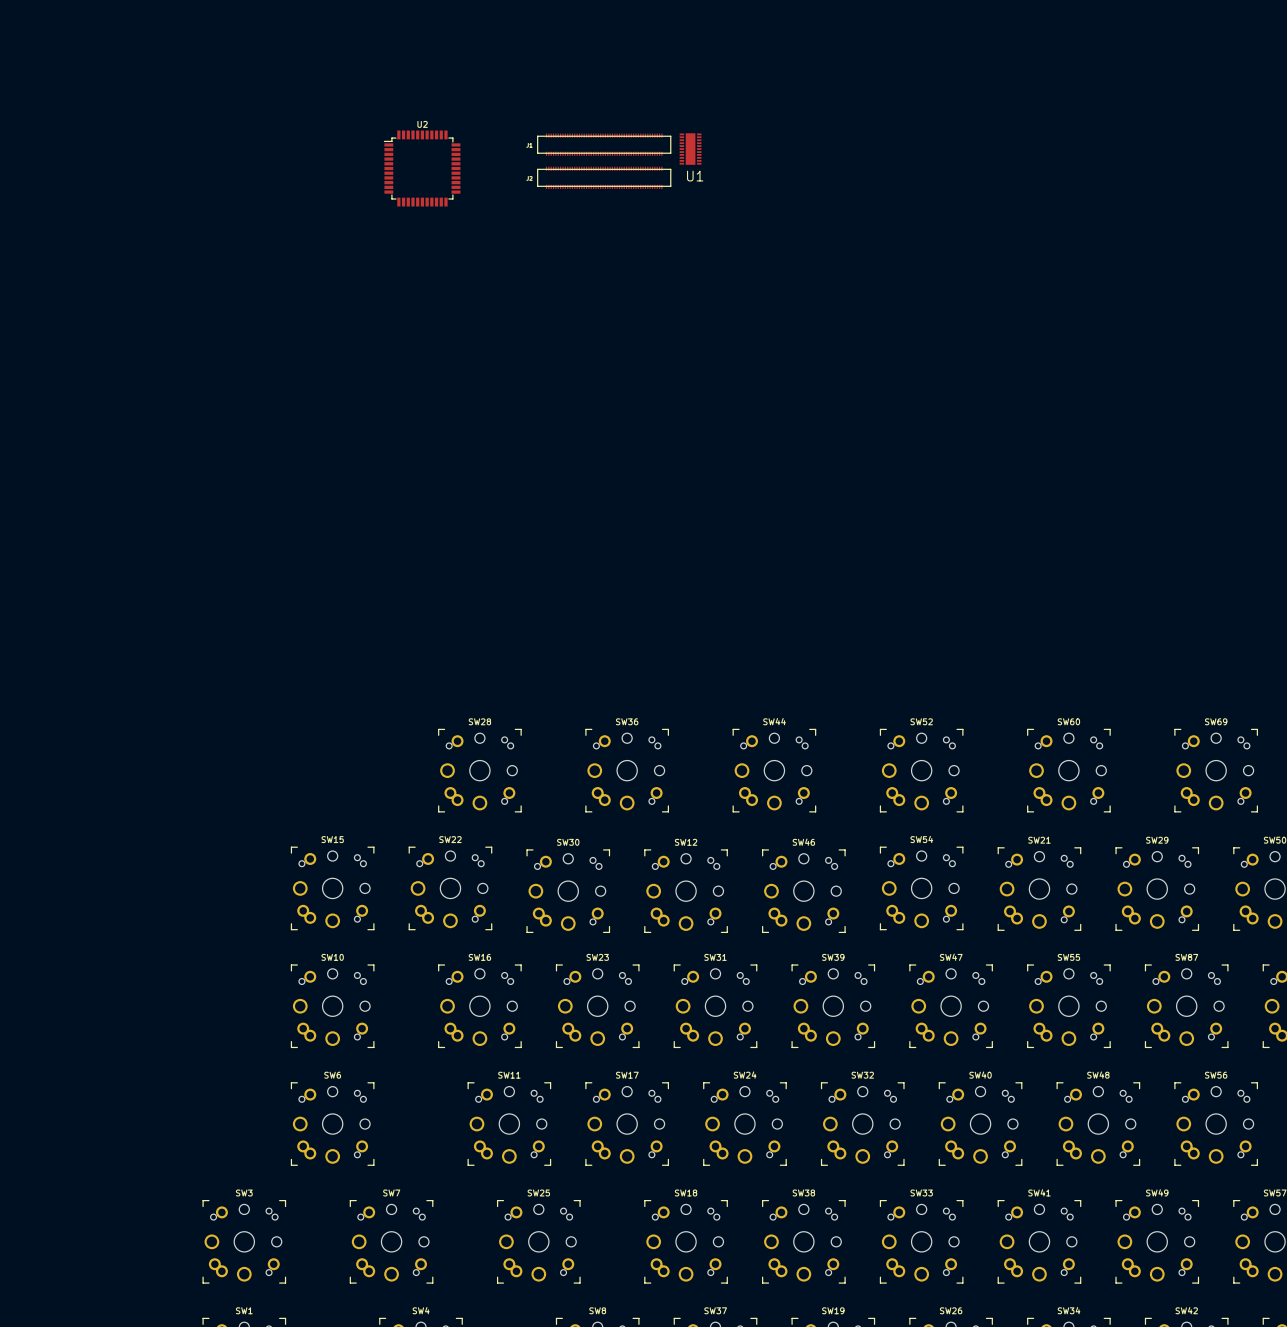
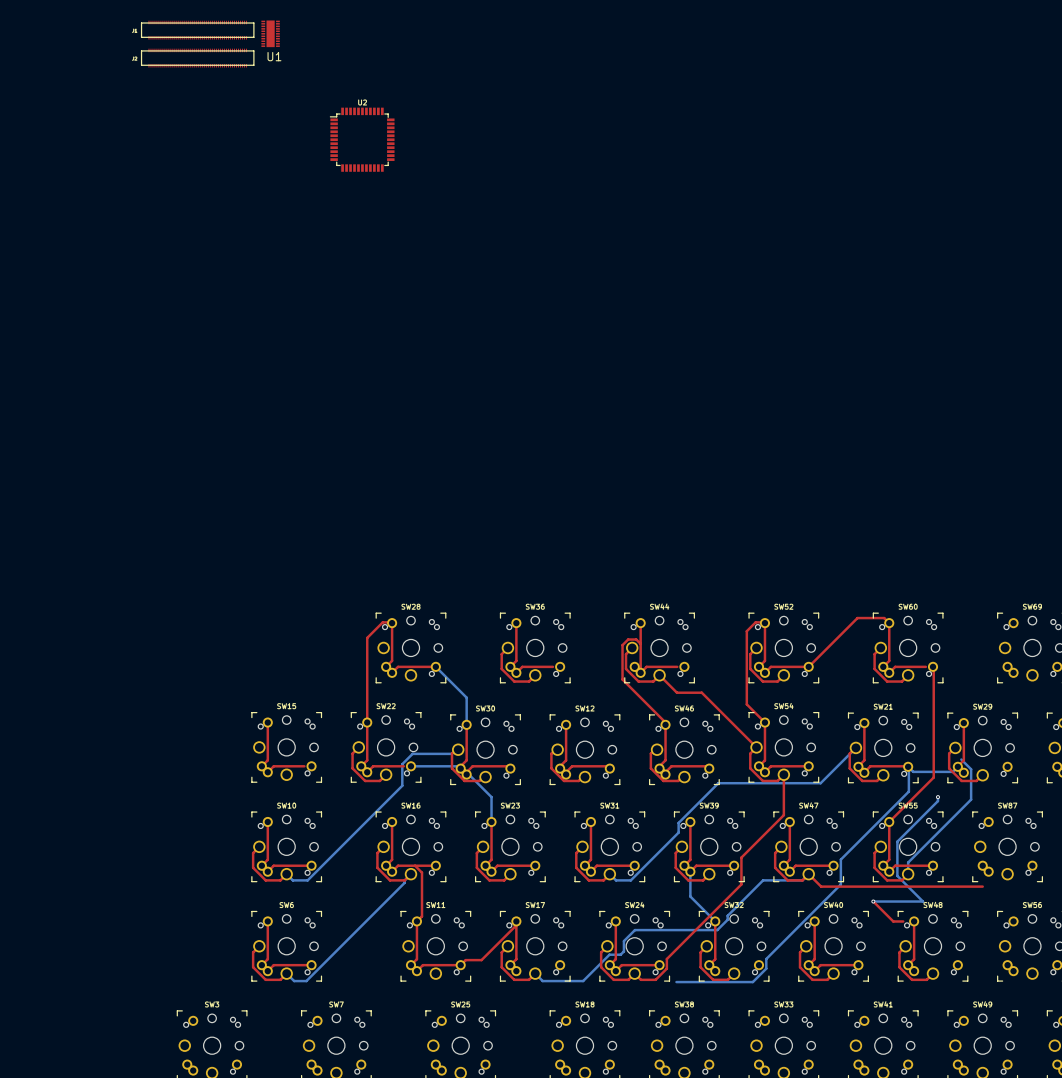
part position: (604, 144) -> (197, 30)
U1 position: (690, 149) -> (270, 33)
part position: (604, 177) -> (197, 58)
top track: none -> (516, 623) (516, 660) (510, 666) (516, 672) (522, 666) (552, 666)
top track: none -> (640, 623) (640, 672) (646, 666) (677, 666)
top track: none -> (640, 643) (636, 639) (628, 639) (622, 645) (622, 679) (665, 722) (665, 760) (659, 766)
top track: none -> (507, 647) (501, 654) (501, 668) (514, 681) (529, 681) (535, 675)
top track: none -> (632, 647) (626, 654) (626, 668) (638, 681) (653, 681) (659, 675) (676, 692) (701, 692) (756, 747) (750, 753) (750, 768) (762, 780) (777, 780) (783, 774) (783, 815) (741, 857) (741, 884) (666, 959) (666, 968) (655, 979) (640, 979) (634, 973) (628, 979) (613, 979) (601, 967) (601, 952) (607, 946)
top track: none -> (756, 647) (750, 654) (750, 668) (762, 681) (777, 681) (783, 675)
top track: none -> (880, 647) (874, 654) (874, 668) (887, 681) (901, 681) (908, 675)
top track: none -> (435, 666) (398, 666) (392, 672) (386, 666) (392, 660) (391, 622) (382, 622) (367, 637) (367, 760) (361, 766) (367, 772) (373, 766) (403, 766)
bottom track: none -> (435, 666) (466, 697) (466, 722)
top track: none -> (759, 666) (764, 660) (764, 622) (755, 622) (746, 631) (746, 704) (764, 722) (764, 760) (759, 766)
top track: none -> (925, 666) (895, 666) (889, 672) (883, 666) (889, 660) (889, 623) (884, 618) (857, 618) (808, 666) (770, 666) (764, 672)
top track: none -> (933, 666) (933, 777) (889, 821) (889, 859) (883, 865)
top track: none -> (267, 722) (267, 760) (261, 766) (267, 772) (273, 766) (304, 766)
top track: none -> (466, 722) (466, 760) (460, 766)
top track: none -> (566, 722) (566, 760) (560, 766)
top track: none -> (864, 722) (864, 760) (858, 766)
top track: none -> (963, 722) (963, 760) (957, 766)
top track: none -> (358, 747) (352, 753) (352, 768) (365, 780) (379, 780) (386, 774)
top track: none -> (458, 747) (452, 753) (452, 768) (464, 780) (479, 780) (485, 774)
bottom track: none -> (458, 747) (451, 753) (412, 753) (402, 764) (402, 785) (307, 880) (292, 880) (286, 874)
top track: none -> (557, 747) (551, 753) (551, 768) (564, 780) (578, 780) (584, 774)
top track: none -> (657, 747) (650, 753) (650, 768) (663, 780) (678, 780) (684, 774)
top track: none -> (855, 747) (849, 753) (849, 768) (862, 780) (877, 780) (883, 774)
top track: none -> (955, 747) (949, 753) (949, 768) (961, 780) (976, 780) (982, 774)
bottom track: none -> (855, 747) (820, 783) (718, 783) (678, 822) (678, 832) (630, 880) (616, 880) (609, 874)
bottom track: none -> (961, 759) (971, 769) (971, 799) (908, 862) (908, 874)
bottom track: none -> (410, 766) (460, 766)
top track: none -> (510, 766) (472, 766) (466, 772)
top track: none -> (609, 766) (572, 766) (566, 772)
top track: none -> (709, 766) (671, 766) (665, 772)
top track: none -> (808, 766) (770, 766) (764, 772)
top track: none -> (908, 766) (870, 766) (864, 772)
bottom track: none -> (908, 766) (913, 771) (952, 771) (957, 766)
bottom track: none -> (908, 767) (908, 791) (840, 859) (840, 884) (766, 959) (766, 968) (752, 982) (676, 982)
bottom track: none -> (466, 772) (491, 797) (491, 821)
bottom track: none -> (937, 797) (937, 801) (897, 841) (897, 875) (922, 901) (873, 901)
via: none -> (937, 797)
top track: none -> (267, 821) (267, 859) (261, 865)
top track: none -> (392, 821) (392, 859) (386, 865)
top track: none -> (491, 821) (491, 859) (485, 865)
top track: none -> (590, 821) (590, 859) (584, 865)
top track: none -> (690, 821) (690, 859) (684, 865)
top track: none -> (789, 821) (789, 859) (783, 865)
top track: none -> (259, 846) (253, 853) (253, 867) (265, 880) (280, 880) (286, 874)
top track: none -> (383, 846) (377, 853) (377, 867) (390, 880) (404, 880) (410, 874)
top track: none -> (483, 846) (476, 853) (476, 867) (489, 880) (504, 880) (510, 874)
top track: none -> (582, 846) (576, 853) (576, 867) (588, 880) (603, 880) (609, 874)
top track: none -> (681, 846) (675, 853) (675, 867) (688, 880) (703, 880) (709, 874)
top track: none -> (781, 846) (775, 853) (775, 867) (787, 880) (802, 880) (808, 874) (821, 886) (982, 886)
top track: none -> (880, 846) (874, 853) (874, 867) (887, 880) (901, 880) (908, 874)
top track: none -> (311, 865) (273, 865) (267, 871)
top track: none -> (415, 865) (422, 872) (422, 916) (416, 921) (416, 959) (410, 965)
top track: none -> (435, 865) (398, 865) (392, 871)
top track: none -> (535, 865) (497, 865) (491, 871)
top track: none -> (634, 865) (596, 865) (590, 871)
top track: none -> (734, 865) (696, 865) (690, 871)
top track: none -> (833, 865) (795, 865) (789, 871)
top track: none -> (933, 865) (895, 865) (889, 871)
bottom track: none -> (690, 871) (690, 896) (715, 921)
bottom track: none -> (410, 874) (404, 882) (306, 981) (294, 981) (286, 973)
bottom track: none -> (808, 874) (802, 880) (763, 880) (727, 915) (727, 919) (717, 930) (634, 930) (623, 941) (623, 951) (620, 954) (609, 954) (583, 981) (542, 981) (535, 973)
top track: none -> (873, 901) (893, 921) (903, 921)
via: none -> (873, 901)
top track: none -> (267, 921) (267, 959) (261, 965)
top track: none -> (516, 921) (516, 959) (510, 965)
top track: none -> (615, 921) (615, 959) (609, 965)
top track: none -> (715, 921) (715, 959) (709, 965)
top track: none -> (814, 921) (814, 959) (808, 965)
top track: none -> (914, 921) (914, 959) (908, 965)
top track: none -> (516, 925) (481, 960) (465, 960) (460, 965) (422, 965) (416, 971)
top track: none -> (259, 946) (253, 952) (253, 967) (265, 979) (280, 979) (286, 973)
top track: none -> (507, 946) (501, 952) (501, 967) (514, 979) (529, 979) (535, 973)
top track: none -> (706, 946) (700, 952) (700, 967) (713, 979) (727, 979) (734, 973)
top track: none -> (806, 946) (800, 952) (800, 967) (812, 979) (827, 979) (833, 973)
top track: none -> (905, 946) (899, 952) (899, 967) (912, 979) (926, 979) (933, 973)
top track: none -> (311, 965) (273, 965) (267, 971)
top track: none -> (659, 965) (621, 965) (615, 971)
top track: none -> (858, 965) (820, 965) (814, 971)

